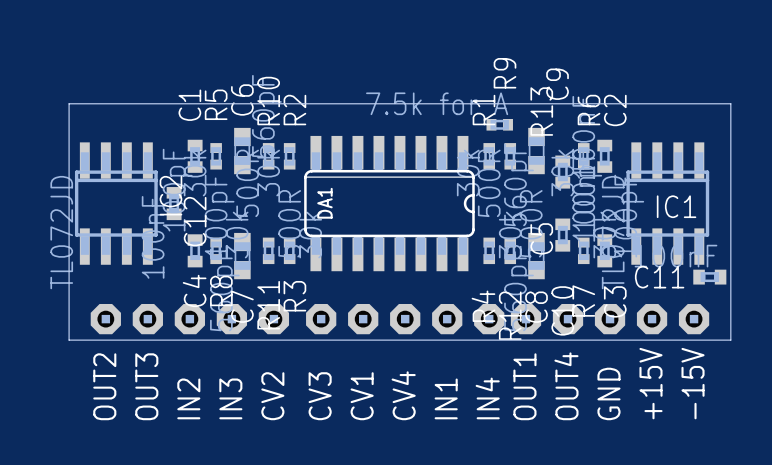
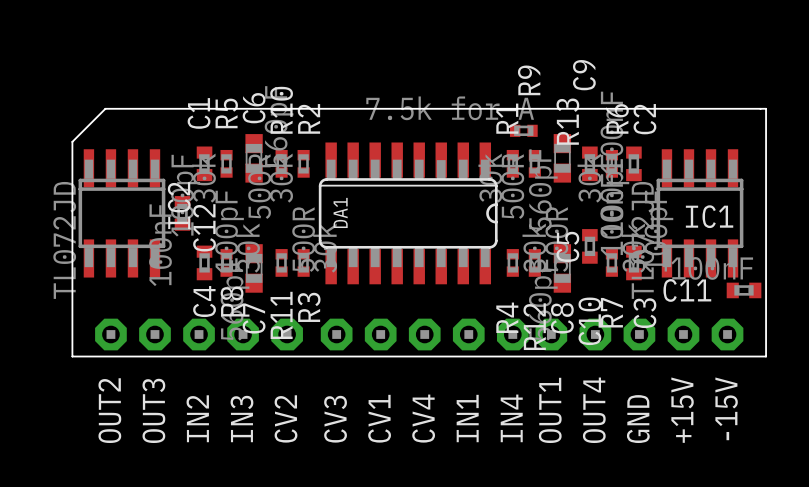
board edge: (100, 103) (69, 103) (69, 135) -> (105, 108) (72, 141)
C9 position: (562, 172) -> (589, 163)

